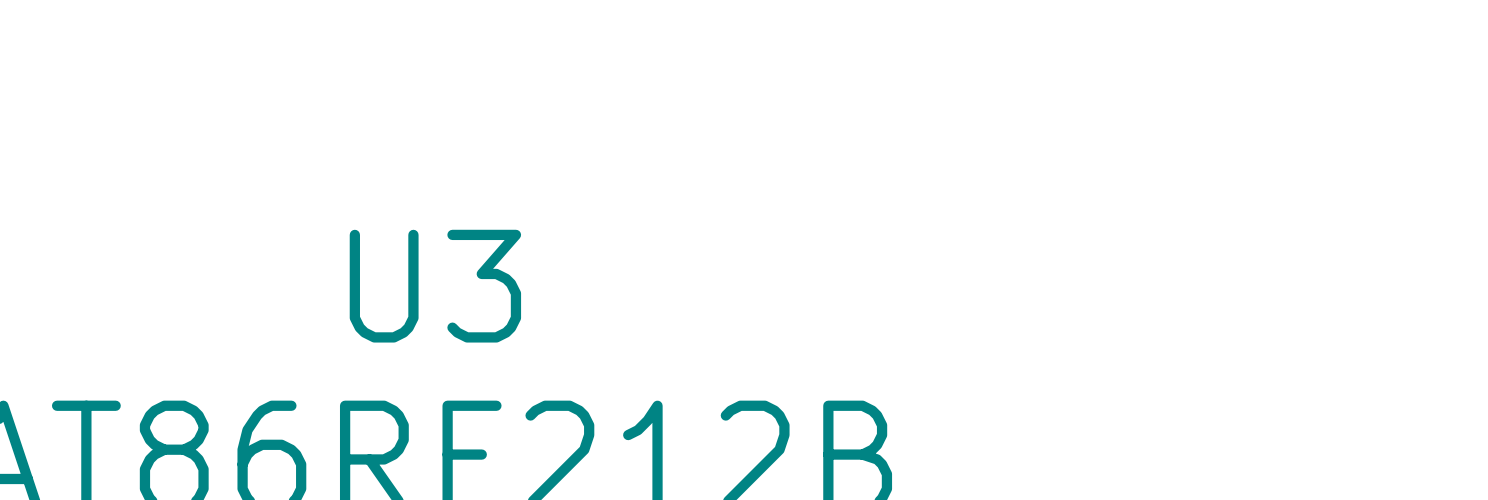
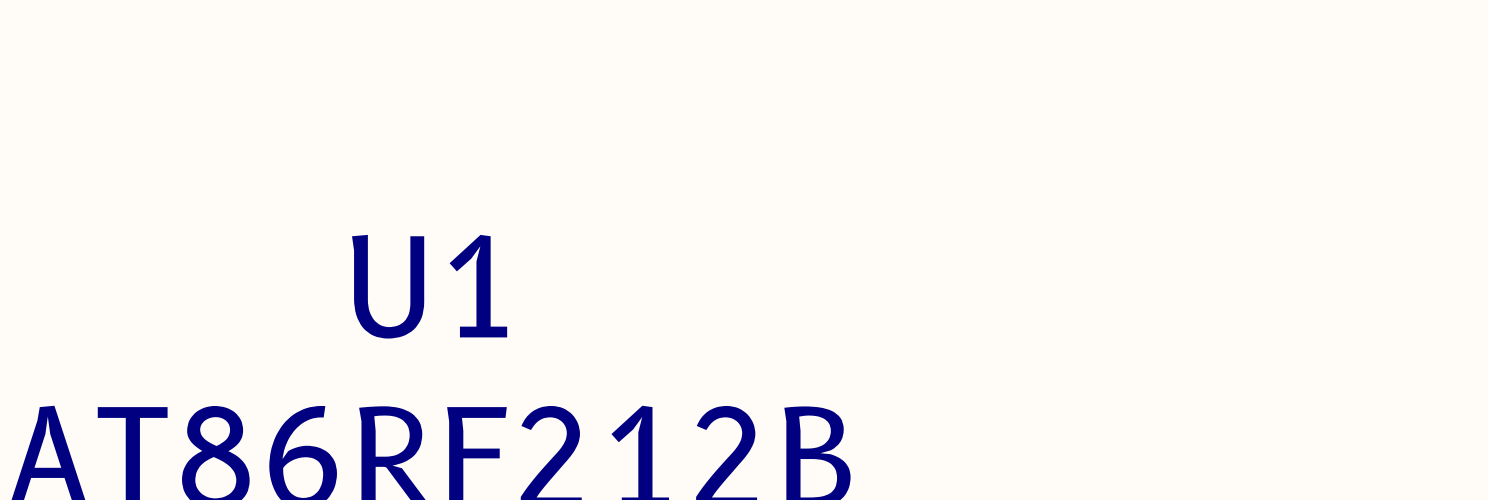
U3 name: U3 (435, 286) -> U1 (429, 286)

